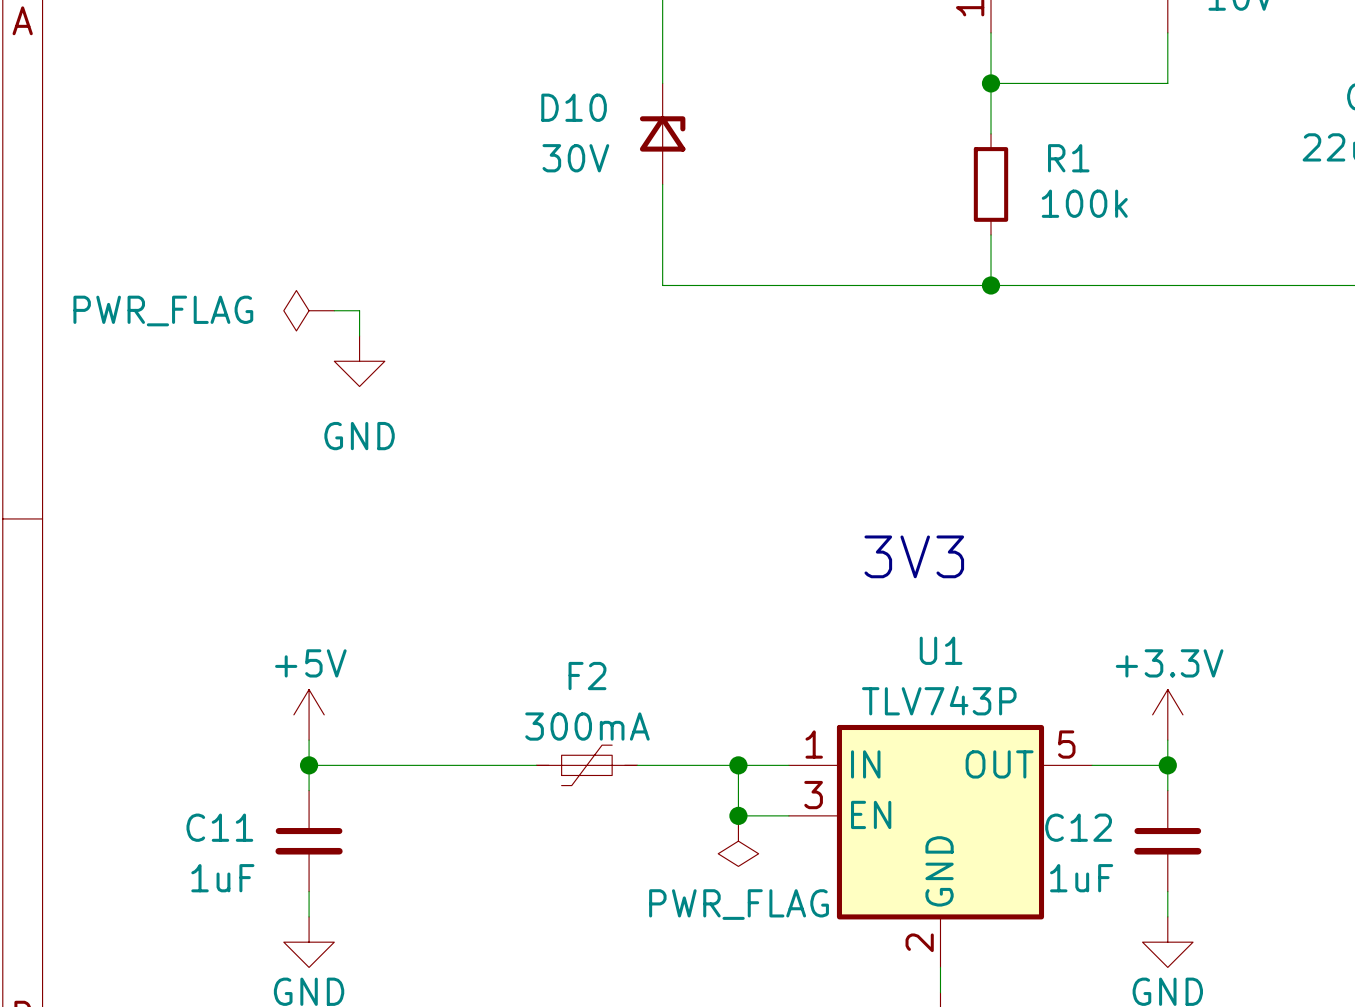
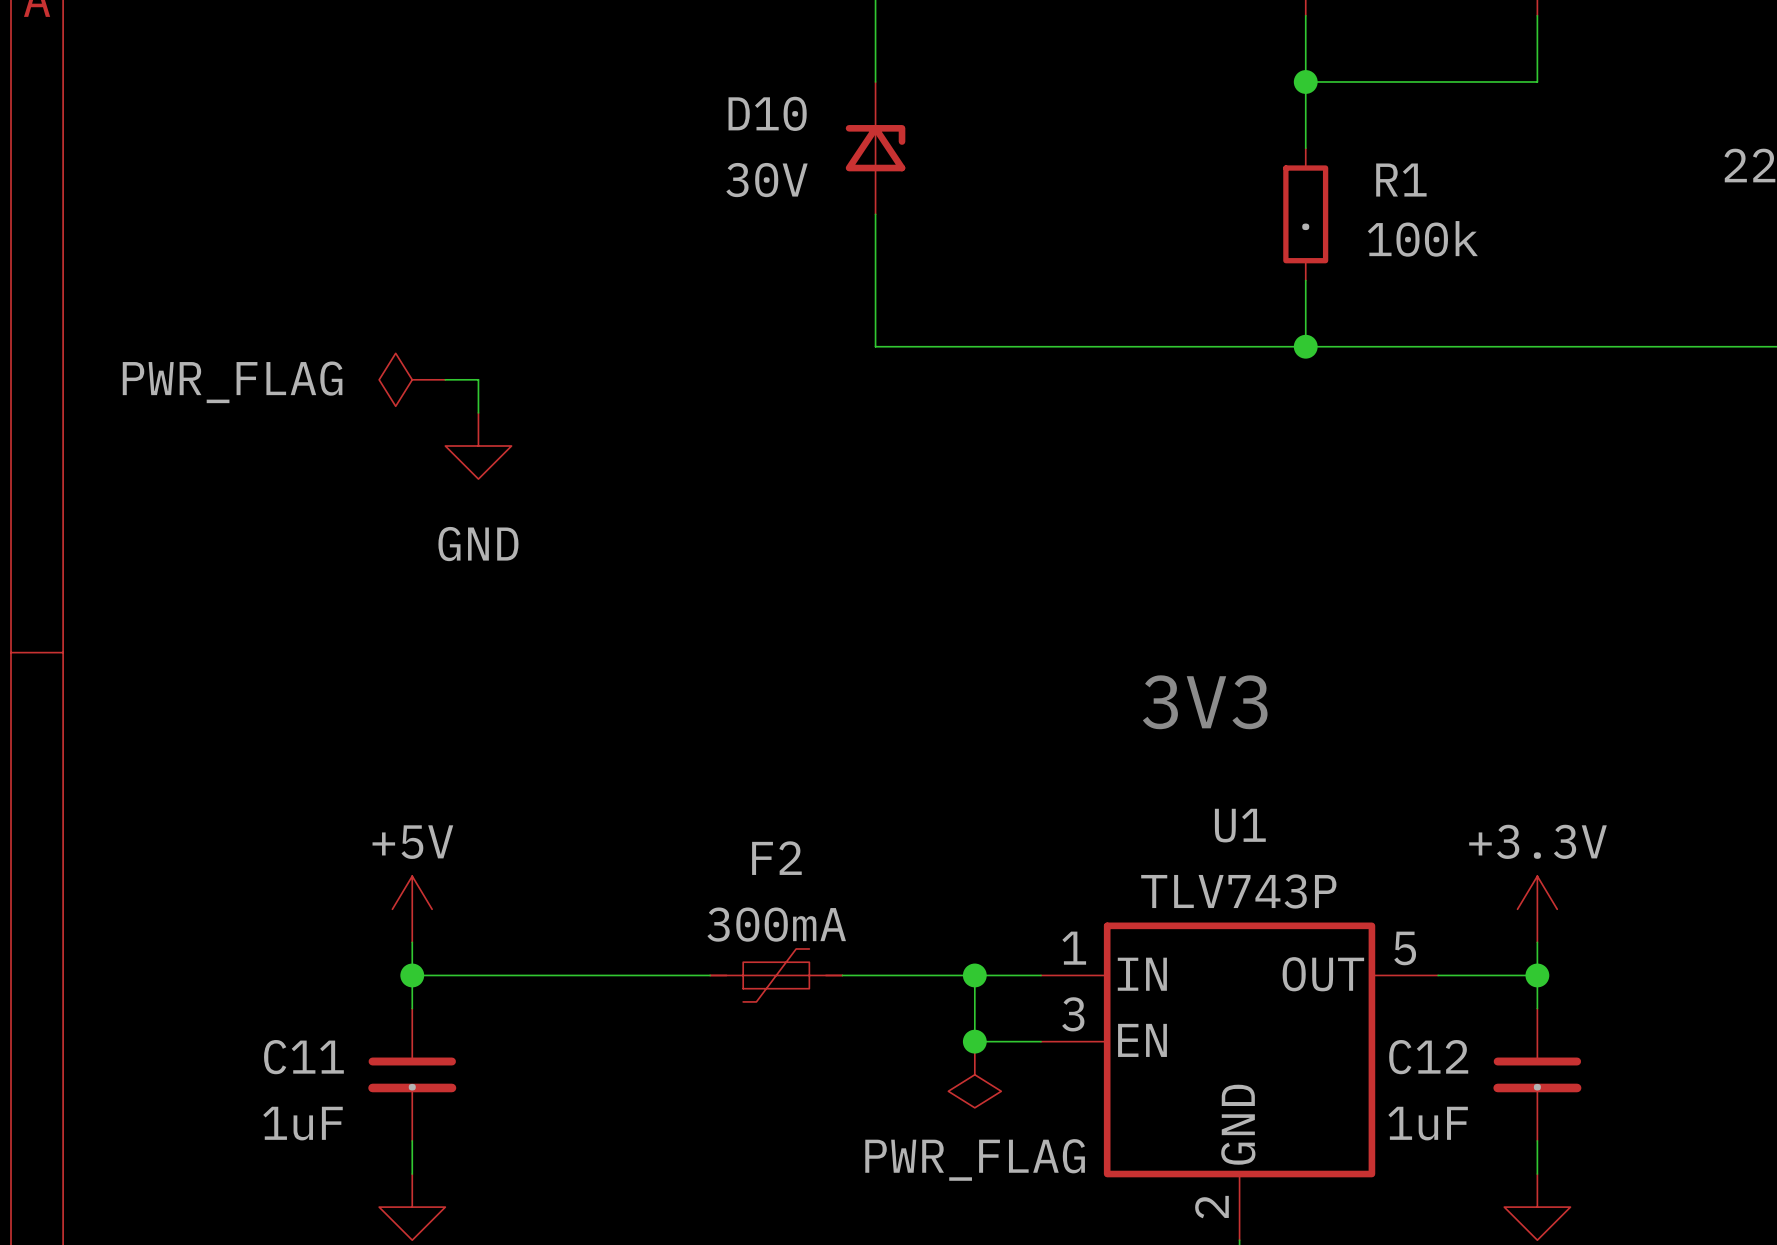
R1 text: none -> . (1305, 226)
C11 text: none -> . (412, 1087)
C12 text: none -> . (1537, 1087)

